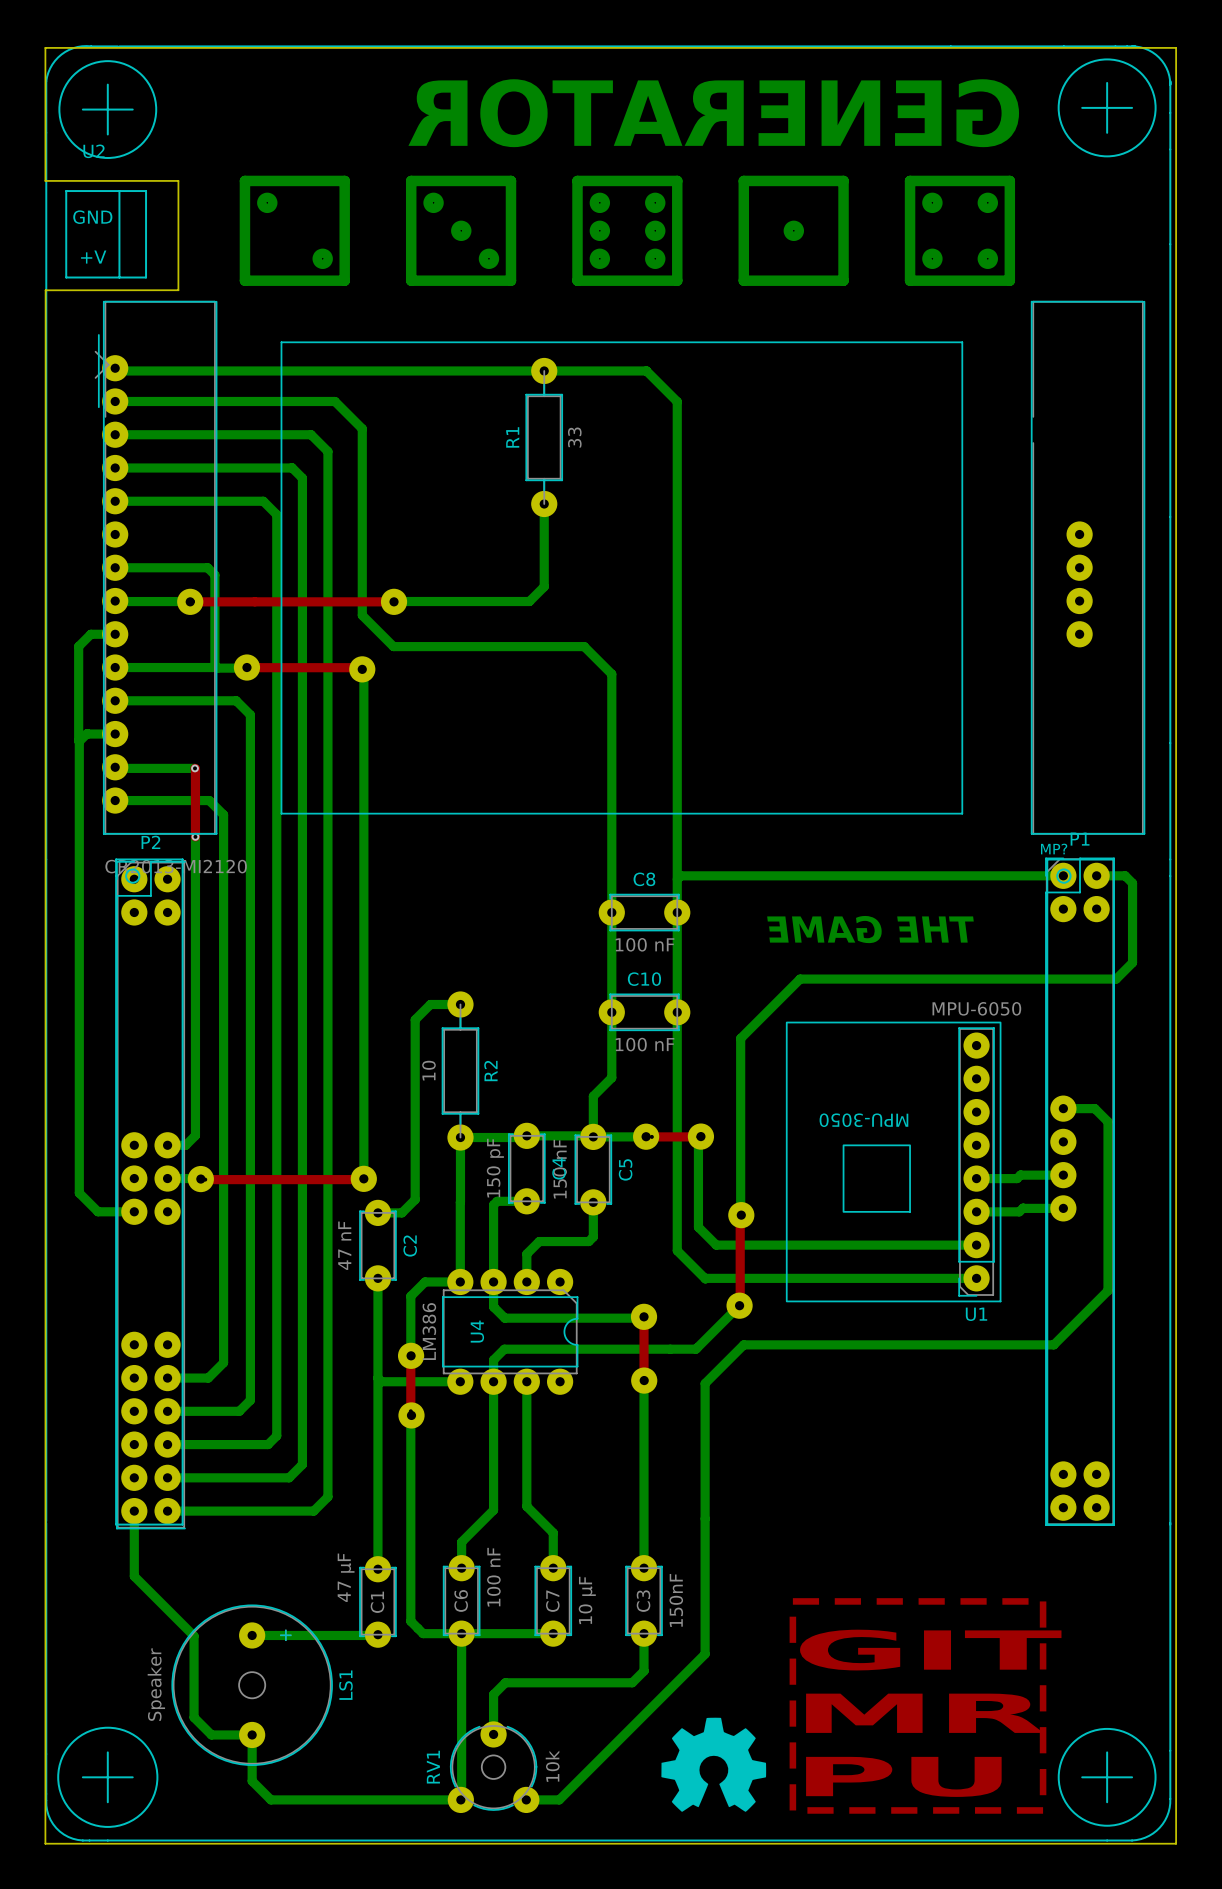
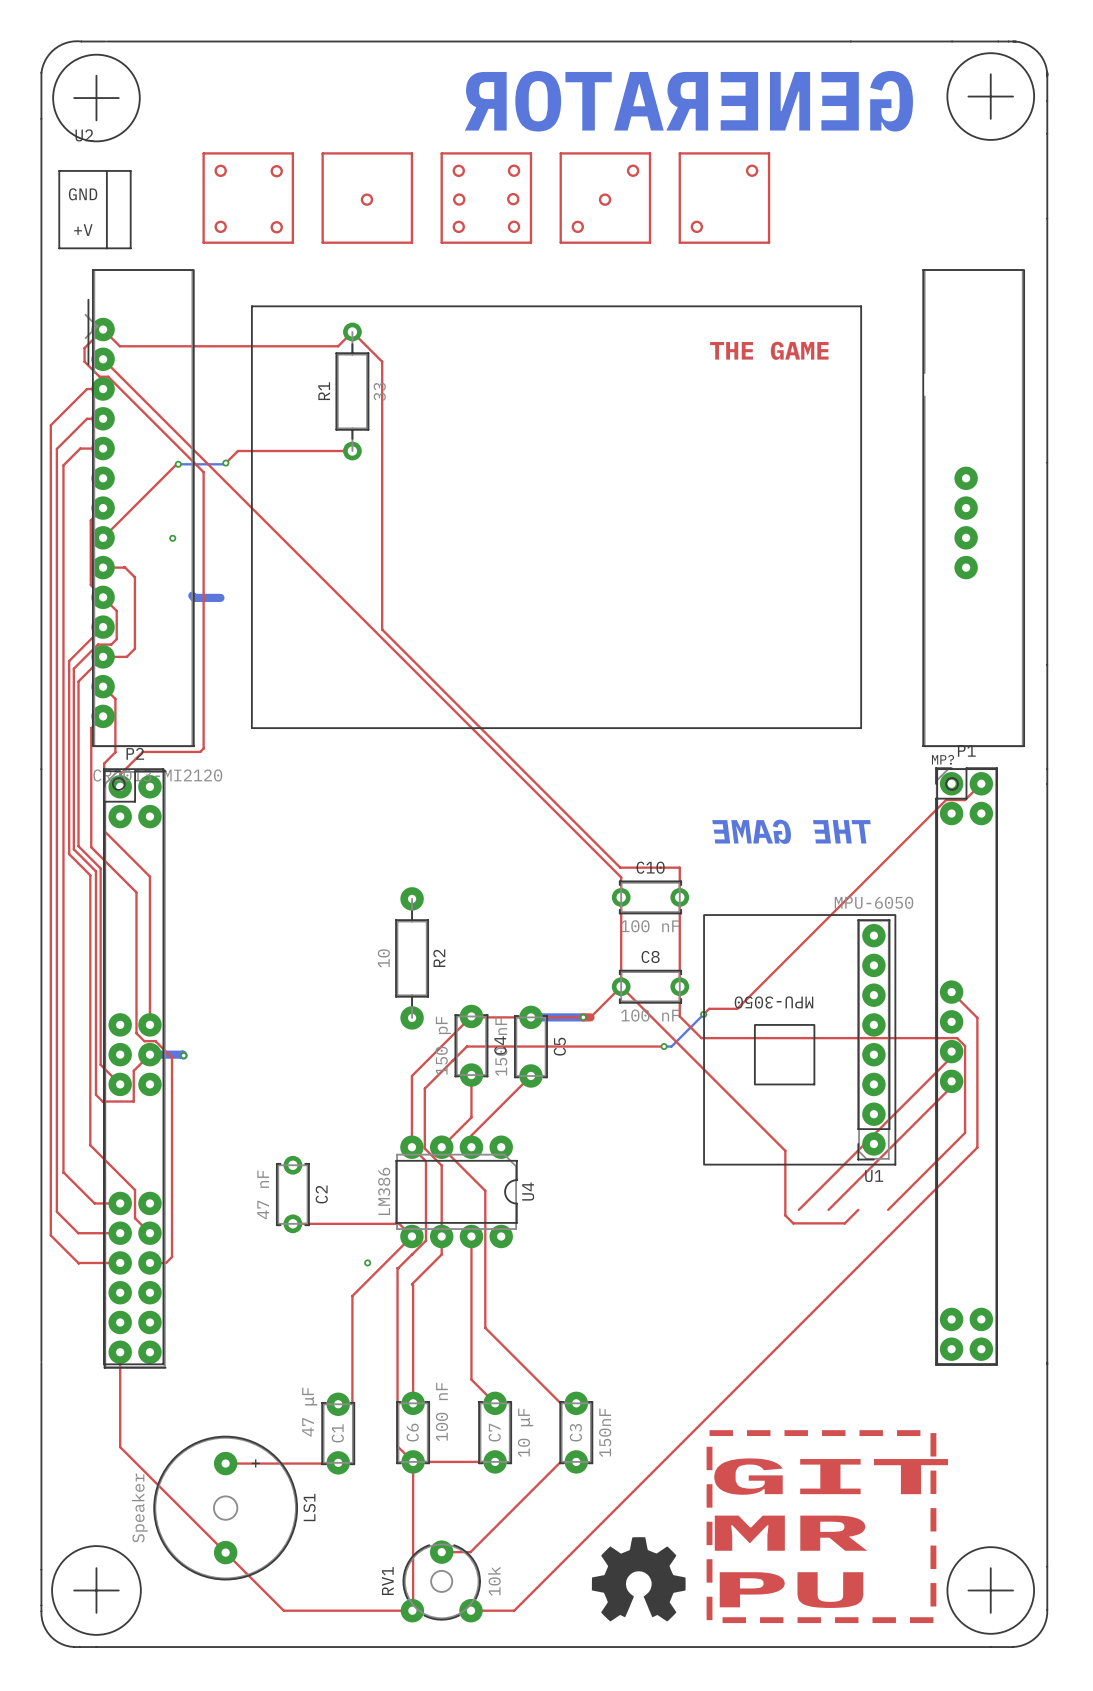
board edge: (45, 47) (45, 180) (178, 180) (178, 290) (45, 290) (45, 1843) (1176, 1843) (1176, 47) (45, 47) -> none
top track: none -> (203, 153) (292, 153) (292, 242) (203, 242) (203, 153)
top track: none -> (322, 153) (411, 153) (411, 242) (322, 242) (322, 153)
top track: none -> (441, 153) (530, 153) (530, 242) (441, 242) (441, 153)
top track: none -> (560, 153) (650, 153) (650, 242) (560, 242) (560, 153)
top track: none -> (679, 153) (769, 153) (769, 242) (679, 242) (679, 153)
bottom track: (244, 180) (344, 180) (344, 280) (244, 280) (244, 180) -> none
bottom track: (411, 180) (510, 180) (510, 280) (411, 280) (411, 180) -> none
bottom track: (577, 180) (677, 180) (677, 280) (577, 280) (577, 180) -> none
bottom track: (743, 180) (843, 180) (843, 280) (743, 280) (743, 180) -> none
bottom track: (910, 180) (1009, 180) (1009, 280) (910, 280) (910, 180) -> none
drawing: none -> [214, 164, 227, 178]
drawing: none -> [452, 164, 465, 178]
drawing: none -> [507, 164, 521, 177]
drawing: none -> [626, 164, 640, 177]
drawing: none -> [745, 164, 759, 177]
drawing: none -> [270, 165, 283, 178]
drawing: [257, 192, 278, 214] -> none
drawing: [423, 192, 500, 269] -> none
drawing: [589, 192, 611, 269] -> none
drawing: [645, 192, 666, 242] -> none
drawing: [922, 192, 943, 214] -> none
drawing: [977, 192, 998, 214] -> none
drawing: none -> [507, 192, 520, 206]
drawing: none -> [360, 193, 374, 206]
drawing: none -> [453, 193, 466, 206]
drawing: none -> [598, 193, 612, 206]
drawing: [783, 220, 805, 242] -> none
drawing: none -> [214, 220, 227, 234]
drawing: none -> [452, 220, 465, 234]
drawing: none -> [507, 220, 521, 233]
drawing: none -> [690, 220, 704, 234]
drawing: none -> [270, 221, 283, 234]
drawing: [312, 248, 333, 269] -> none
drawing shape: [645, 248, 666, 269] -> [571, 220, 585, 234]
drawing: [922, 248, 943, 269] -> none
drawing: [977, 248, 998, 269] -> none
R1 footprint: [525, 357, 563, 518] -> [335, 322, 370, 461]
bottom track: (115, 368) (117, 370) (646, 370) -> none
bottom track: (646, 370) (677, 401) (677, 1250) (705, 1278) (976, 1278) -> none
text: none -> THE GAME (769, 350)
top track: none -> (103, 359) (621, 877) (621, 986)
bottom track: (115, 401) (334, 401) (362, 428) (362, 615) (393, 646) (584, 646) (611, 674) (611, 1077) (593, 1096) (593, 1136) (460, 1137) (460, 1202) -> none
top track: none -> (103, 389) (87, 389) (50, 425) (50, 1235) (78, 1263) (120, 1262)
bottom track: (115, 434) (311, 434) (327, 451) (327, 1496) (313, 1511) (167, 1511) -> none
top track: none -> (103, 418) (87, 418) (56, 448) (56, 1211) (78, 1233) (120, 1233)
bottom track: (115, 467) (292, 467) (302, 478) (302, 1464) (289, 1477) (167, 1477) -> none
top track: none -> (103, 448) (80, 448) (63, 465) (63, 1172) (94, 1203) (120, 1203)
bottom track: (115, 501) (263, 501) (276, 514) (276, 1435) (268, 1444) (167, 1444) -> none
top track: none -> (352, 451) (237, 451) (225, 463)
bottom track: (544, 504) (544, 586) (529, 601) (394, 601) -> none
bottom track: none -> (225, 463) (178, 464)
via: none -> (225, 463)
top track: none -> (178, 464) (103, 537)
via: none -> (178, 464)
top track: none -> (103, 508) (90, 520) (90, 585) (116, 611) (116, 639) (111, 644) (97, 644) (73, 668) (73, 849) (95, 871) (95, 1094) (102, 1101) (133, 1101) (133, 1070) (149, 1054)
bottom track: (115, 567) (207, 567) (214, 575) (214, 665) (213, 667) (115, 667) -> none
bottom track: (115, 601) (193, 601) -> none
part: (190, 601) -> none
top track: (193, 601) (394, 601) -> none
part: (394, 601) -> none
top track: none -> (103, 567) (124, 567) (134, 577) (134, 648) (126, 656) (103, 656) (78, 681) (78, 846) (100, 868) (100, 1064) (120, 1084)
bottom track: (115, 634) (90, 634) (78, 646) (79, 741) -> none
part: (246, 667) -> none
top track: (362, 667) (246, 668) -> none
bottom track: (362, 667) (363, 1179) -> none
part: (362, 669) -> none
top track: none -> (103, 627) (69, 661) (69, 854) (90, 875) (90, 1145) (135, 1190) (135, 1218) (149, 1233)
bottom track: (115, 700) (236, 700) (250, 714) (250, 1400) (239, 1411) (167, 1411) -> none
bottom track: (115, 734) (87, 733) (79, 741) -> none
bottom track: (79, 741) (79, 1193) (98, 1211) (134, 1211) -> none
top track: none -> (103, 686) (115, 698) (115, 752) (104, 763) (104, 830) (149, 876) (149, 1024)
bottom track: (116, 768) (195, 768) -> none
top track: (195, 768) (195, 836) -> none
via: (195, 768) -> none
top track: none -> (103, 716) (91, 728) (91, 847) (136, 892) (136, 1033) (144, 1041) (155, 1041) (172, 1057) (172, 1256) (166, 1262) (149, 1262)
bottom track: (115, 800) (209, 800) (223, 814) (223, 1362) (208, 1378) (167, 1378) -> none
bottom track: (195, 836) (195, 1135) (185, 1145) (167, 1145) -> none
via: (195, 836) -> none
bottom track: (1063, 875) (680, 875) (677, 879) -> none
top track: none -> (981, 783) (965, 800) (946, 800) (737, 1008) (709, 1008) (703, 1014)
bottom track: (1096, 875) (1125, 875) (1132, 883) (1132, 962) (1116, 979) (800, 979) (740, 1038) (740, 1215) -> none
top track: none -> (120, 786) (120, 774) (142, 751) (200, 751) (203, 748) (203, 472) (108, 376) (99, 376) (84, 361) (84, 348) (103, 329) (119, 346) (338, 346) (352, 331) (382, 361) (382, 629) (620, 867) (679, 867) (679, 1016) (701, 1038) (957, 1038) (965, 1046) (965, 1132) (888, 1209)
C8 footprint: [598, 893, 691, 932] -> [611, 969, 690, 1004]
C10 footprint: [598, 993, 691, 1032] -> [611, 880, 690, 915]
bottom track: (460, 1004) (430, 1004) (415, 1019) (415, 1199) (401, 1212) (377, 1212) -> none
top track: none -> (621, 986) (785, 1150) (785, 1215) (793, 1223) (844, 1223) (858, 1209)
top track: none -> (951, 992) (977, 1017) (977, 1147) (514, 1610) (470, 1610)
bottom track: (1063, 1108) (1094, 1108) (1108, 1121) (1108, 1290) (1053, 1344) (743, 1344) (705, 1383) (705, 1654) (559, 1799) (526, 1799) -> none
bottom track: none -> (703, 1014) (671, 1046) (664, 1046)
via: none -> (703, 1014)
part: (646, 1136) -> none
top track: none -> (583, 1017) (471, 1016) (411, 1075) (411, 1147) (425, 1161) (425, 1240) (412, 1254)
top track: (659, 1136) (698, 1136) -> (590, 1017) (621, 986)
part: (700, 1136) -> none
bottom track: (698, 1137) (698, 1227) (716, 1245) (976, 1245) -> none
top track: none -> (664, 1046) (466, 1046) (424, 1088) (424, 1148) (441, 1165) (441, 1254) (411, 1284) (413, 1403)
via: none -> (664, 1046)
bottom track: (1020, 1175) (1017, 1178) (976, 1178) -> none
bottom track: (1020, 1175) (1063, 1175) -> none
top track: none -> (951, 1051) (951, 1057) (798, 1209)
part: (363, 1178) -> none
part: (200, 1179) -> none
top track: (363, 1179) (205, 1179) -> none
C2 footprint: [359, 1199, 397, 1292] -> [276, 1155, 310, 1234]
top track: none -> (471, 1075) (471, 1117) (441, 1147) (485, 1190) (485, 1327) (560, 1403)
bottom track: (526, 1201) (497, 1201) (493, 1204) (493, 1306) (504, 1318) (642, 1318) -> none
bottom track: (460, 1202) (460, 1281) (425, 1281) (410, 1296) (410, 1356) -> none
top track: none -> (530, 1075) (471, 1135) (471, 1147)
bottom track: (593, 1202) (593, 1237) (588, 1241) (539, 1241) (526, 1253) (526, 1281) -> none
top track: none -> (951, 1081) (951, 1086) (828, 1209)
bottom track: (1063, 1208) (1023, 1208) (1019, 1211) (976, 1211) -> none
top track: (740, 1215) (740, 1305) -> none
part: (741, 1215) -> none
bottom track: (377, 1278) (377, 1569) -> none
part: (739, 1305) -> none
bottom track: (740, 1305) (695, 1349) (504, 1349) (493, 1360) (493, 1510) (461, 1542) (461, 1568) -> none
part: (644, 1316) -> none
top track: (642, 1318) (644, 1319) (644, 1378) -> none
U4 name position: U4 (477, 1331) -> U4 (528, 1191)
part: (411, 1355) -> none
top track: (410, 1356) (410, 1411) -> none
top track: none -> (292, 1223) (399, 1223) (411, 1236) (352, 1296) (352, 1404)
bottom track: (377, 1378) (381, 1381) (460, 1381) -> none
bottom track: (644, 1378) (644, 1568) -> none
part: (644, 1380) -> none
top track: none -> (471, 1236) (471, 1379) (495, 1403)
bottom track: (526, 1381) (526, 1506) (553, 1532) (553, 1568) -> none
top track: none -> (411, 1254) (397, 1268) (397, 1446) (413, 1461)
bottom track: (410, 1411) (410, 1621) (423, 1633) (553, 1633) -> none
part: (411, 1415) -> none
top track: none -> (120, 1352) (120, 1447) (283, 1610) (413, 1610) (413, 1461)
bottom track: (134, 1511) (134, 1576) (194, 1636) (194, 1717) (211, 1734) (252, 1734) (252, 1781) (270, 1799) (460, 1799) (461, 1633) -> none
top track: none -> (413, 1461) (495, 1461)
top track: none -> (560, 1461) (470, 1552) (441, 1552)
bottom track: (644, 1633) (644, 1671) (632, 1682) (505, 1682) (493, 1694) (493, 1734) -> none
bottom track: (377, 1634) (252, 1635) -> none
top track: none -> (352, 1462) (225, 1463)

